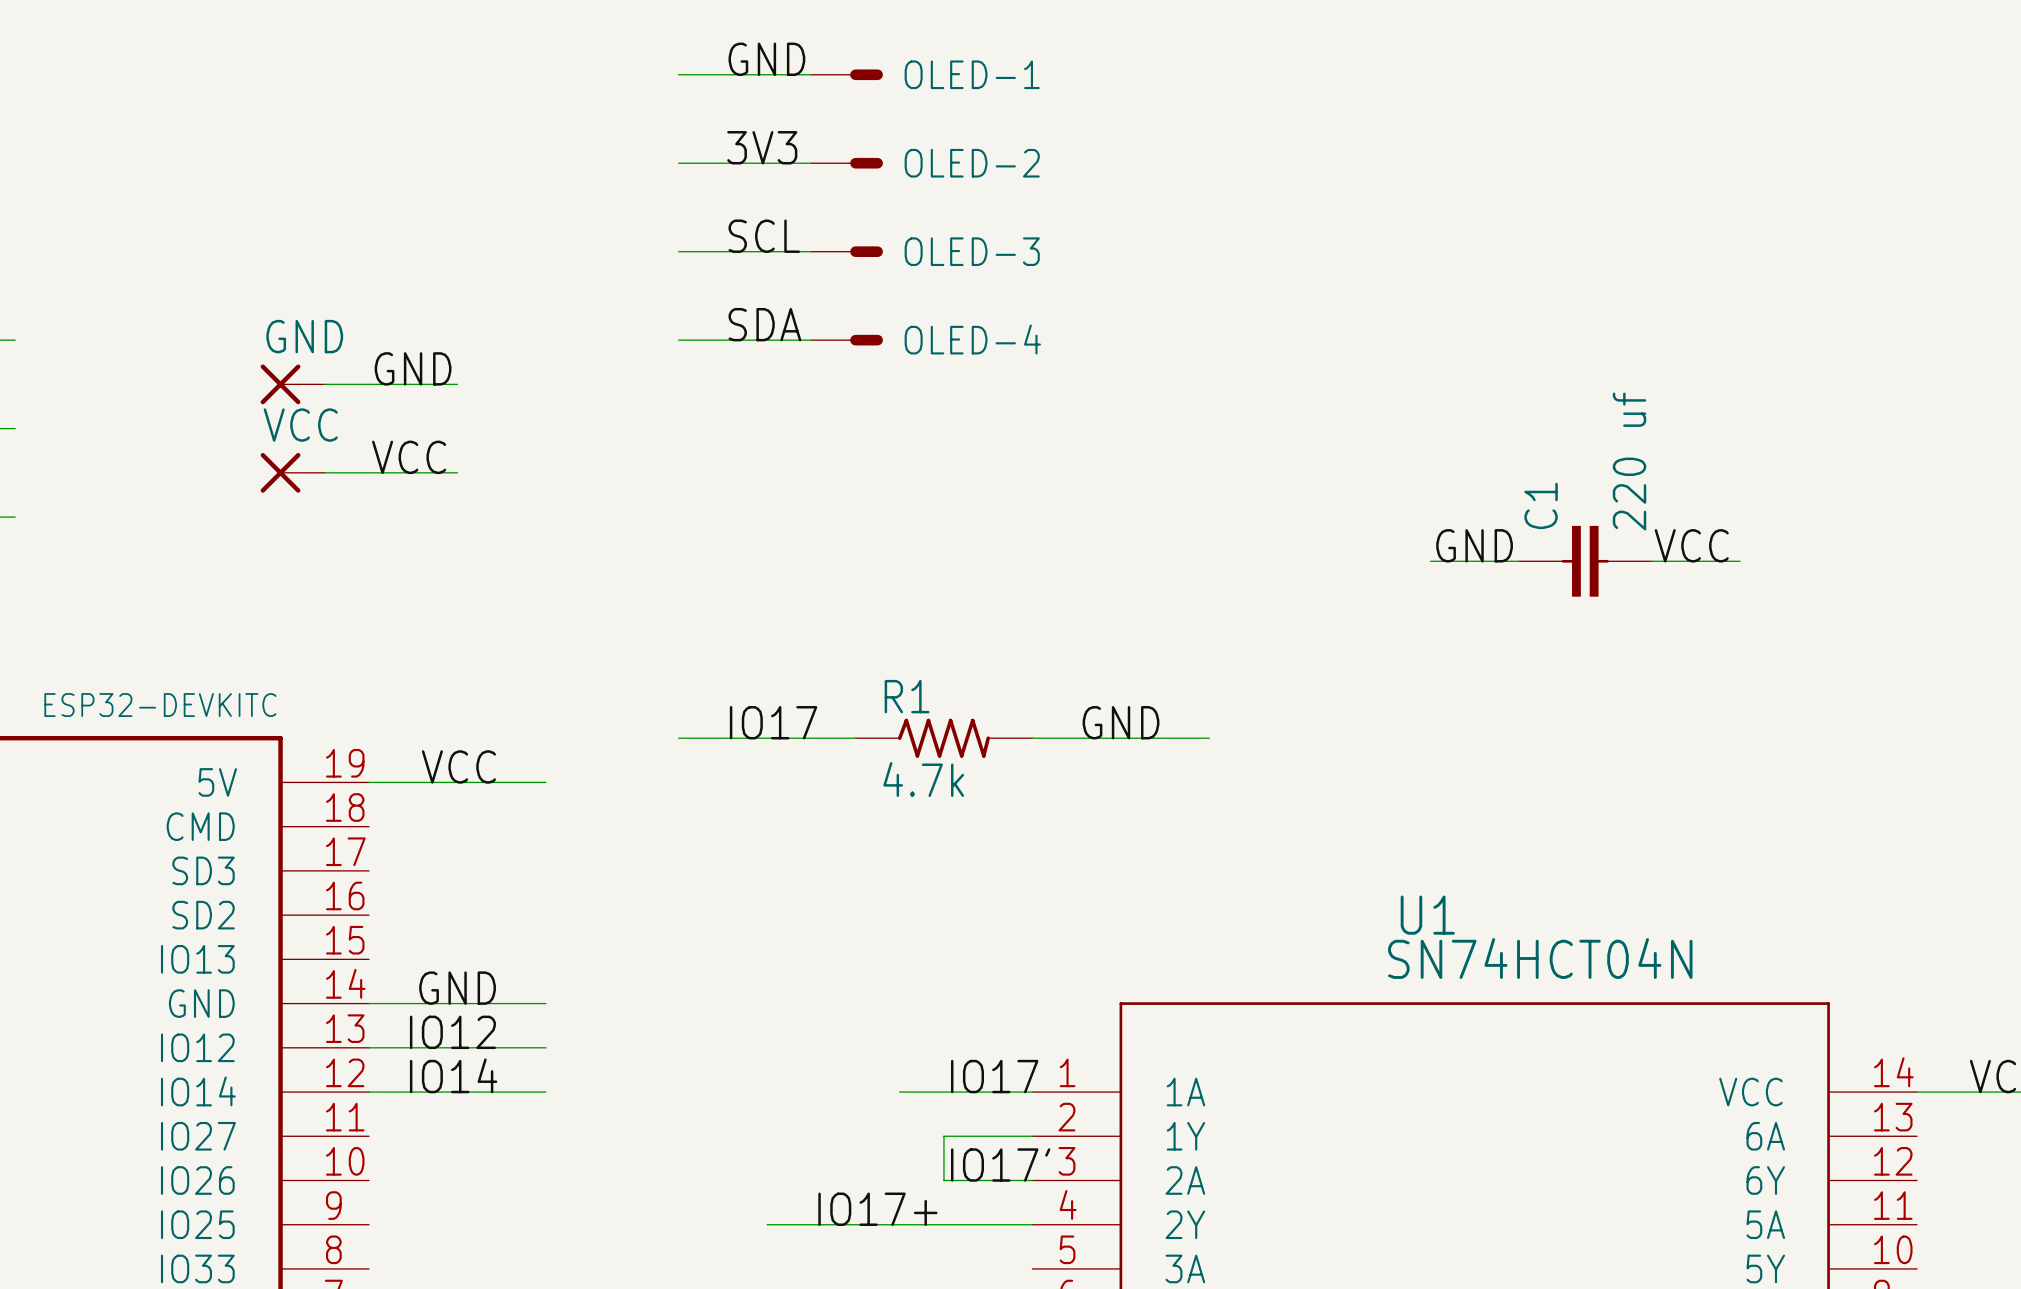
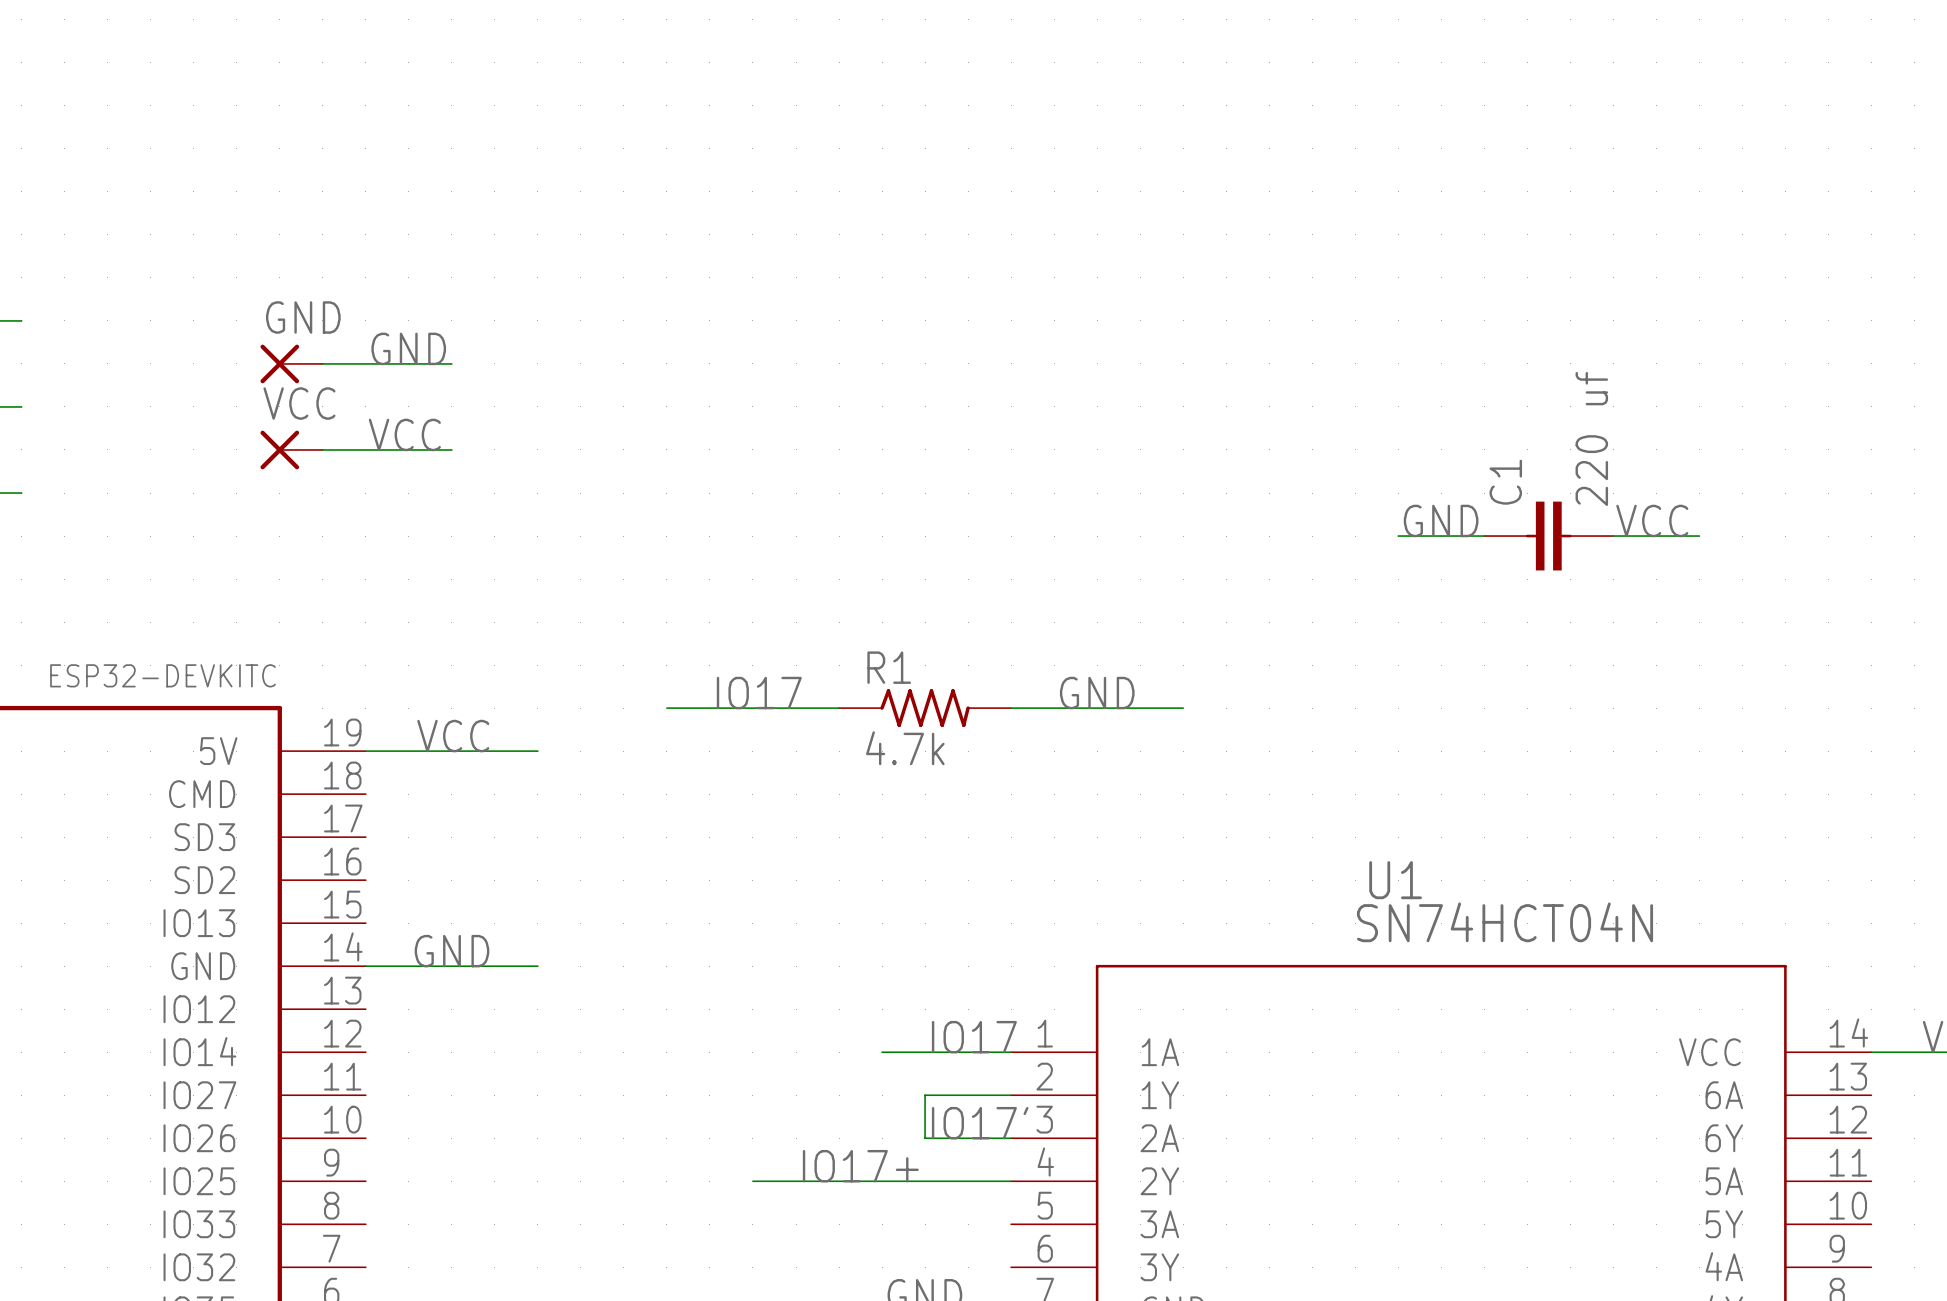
label: GND (766, 59) -> none
wire: (678, 74) (811, 74) -> none
OLED-1: (847, 74) -> none
label: 3V3 (762, 147) -> none
wire: (678, 163) (811, 163) -> none
OLED-2: (847, 163) -> none
label: SCL (764, 236) -> none
wire: (678, 251) (811, 251) -> none
OLED-3: (847, 251) -> none
label: SDA (764, 324) -> none
wire: (678, 340) (811, 340) -> none
OLED-4: (847, 340) -> none
label: IO12 (452, 1032) -> none
wire: (368, 1047) (545, 1047) -> none
label: IO14 (453, 1075) -> none
wire: (368, 1092) (545, 1092) -> none

